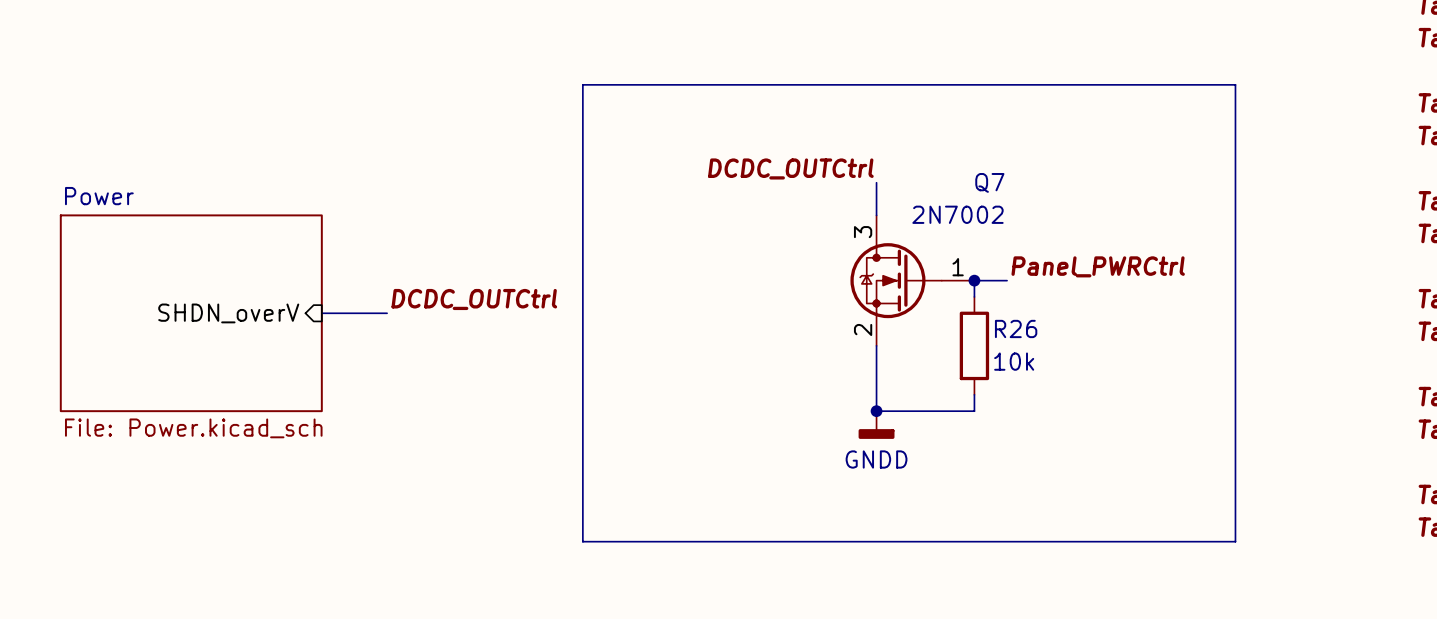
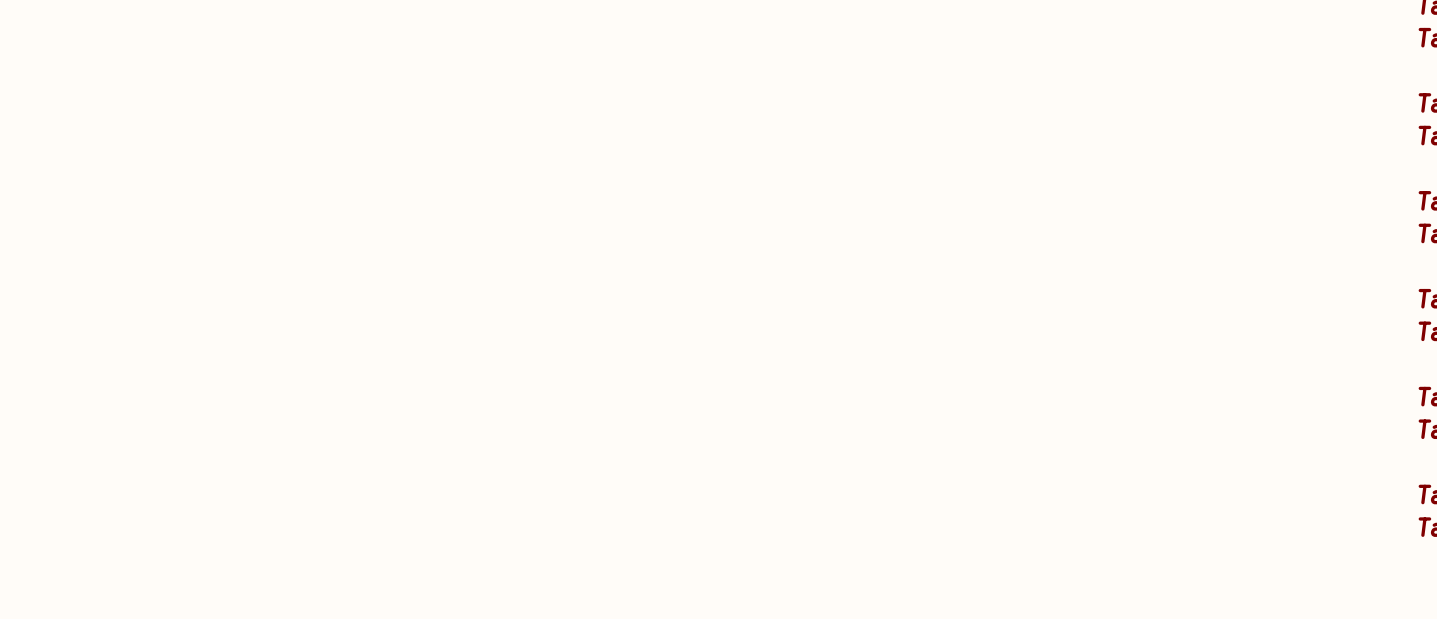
line: (582, 84) (1235, 84) (1235, 541) (582, 541) (582, 84) -> none
label: DCDC_OUTCtrl (790, 168) -> none
wire: (876, 182) (876, 215) -> none
label: Panel_PWRCtrl (1098, 266) -> none
Q7: 2N7002 (912, 280) -> none
junction: (974, 280) -> none
wire: (1007, 280) (974, 280) (974, 296) -> none
label: DCDC_OUTCtrl (474, 299) -> none
sheet Power: File: Power.kicad_sch (191, 313) -> none
sheet pin: SHDN_overV (228, 313) -> none
wire: (321, 313) (387, 313) -> none
wire: (876, 345) (876, 411) (974, 411) (974, 394) -> none
R26: 10k (974, 345) -> none
junction: (876, 411) -> none
power symbol: GNDD (876, 425) -> none

